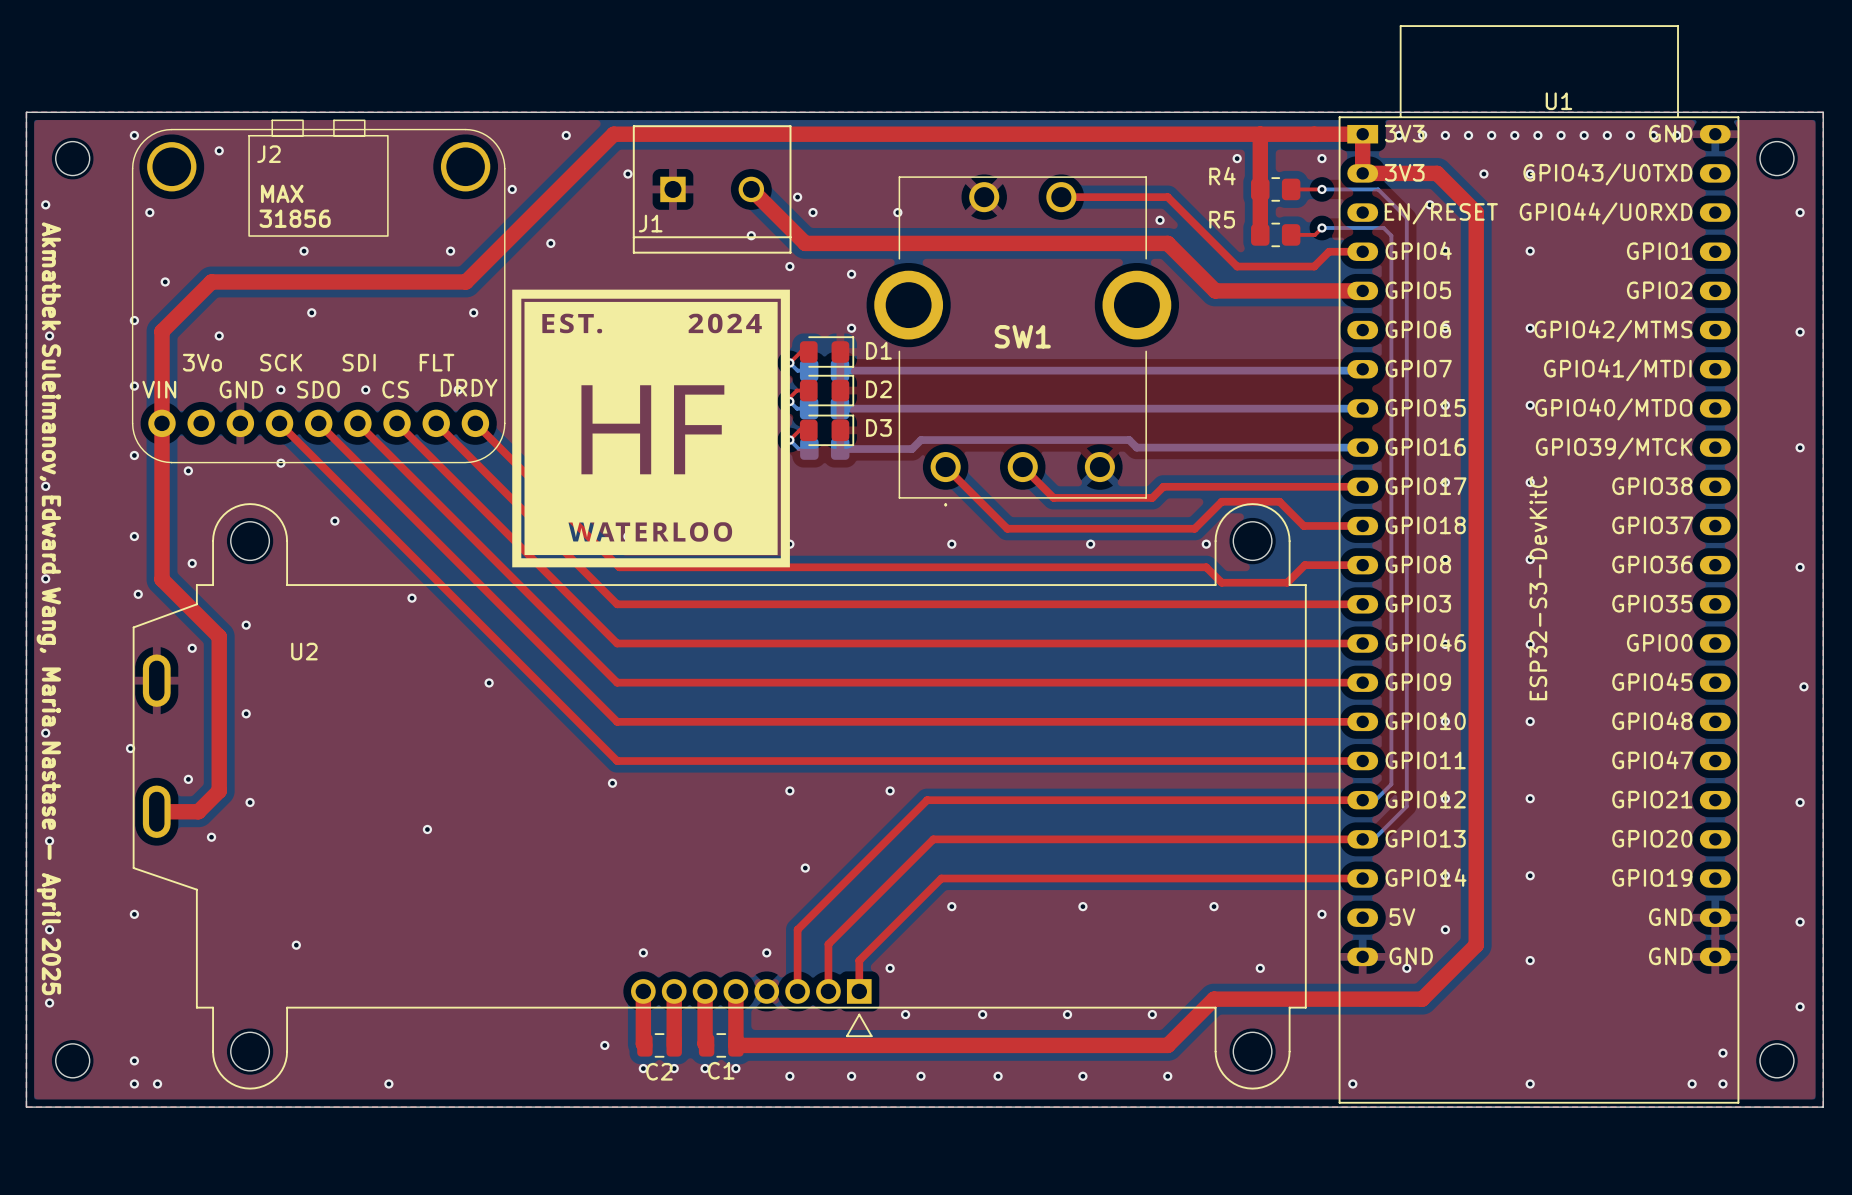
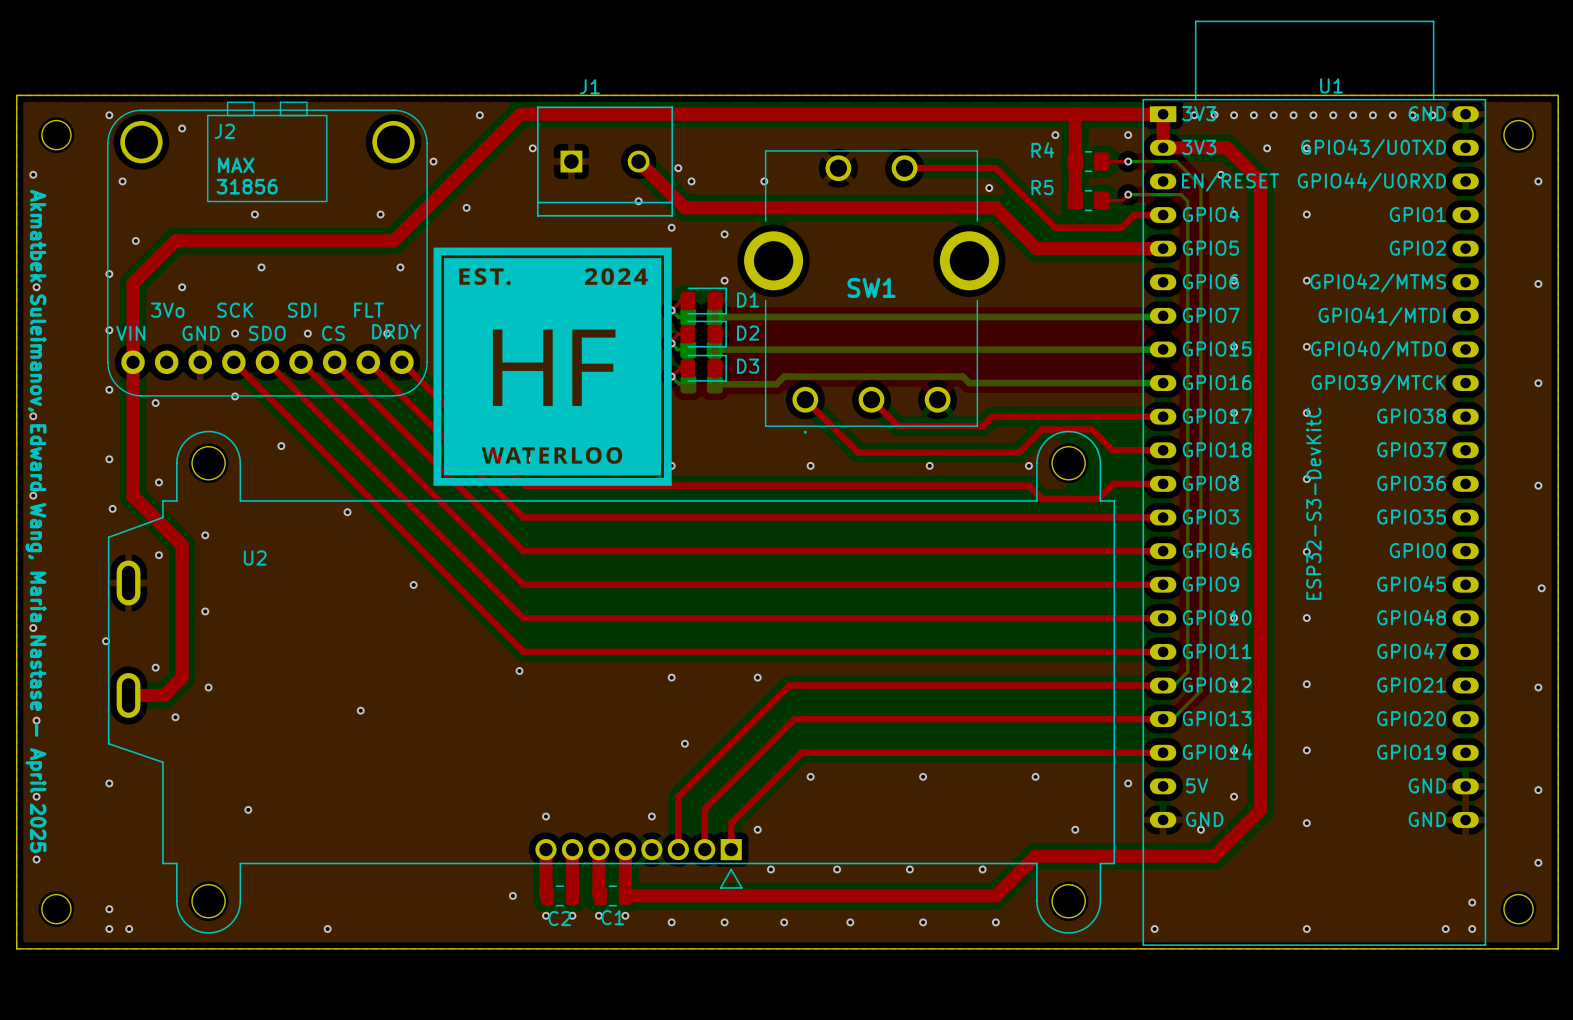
J1 name position: J1 (650, 223) -> J1 (589, 86)

